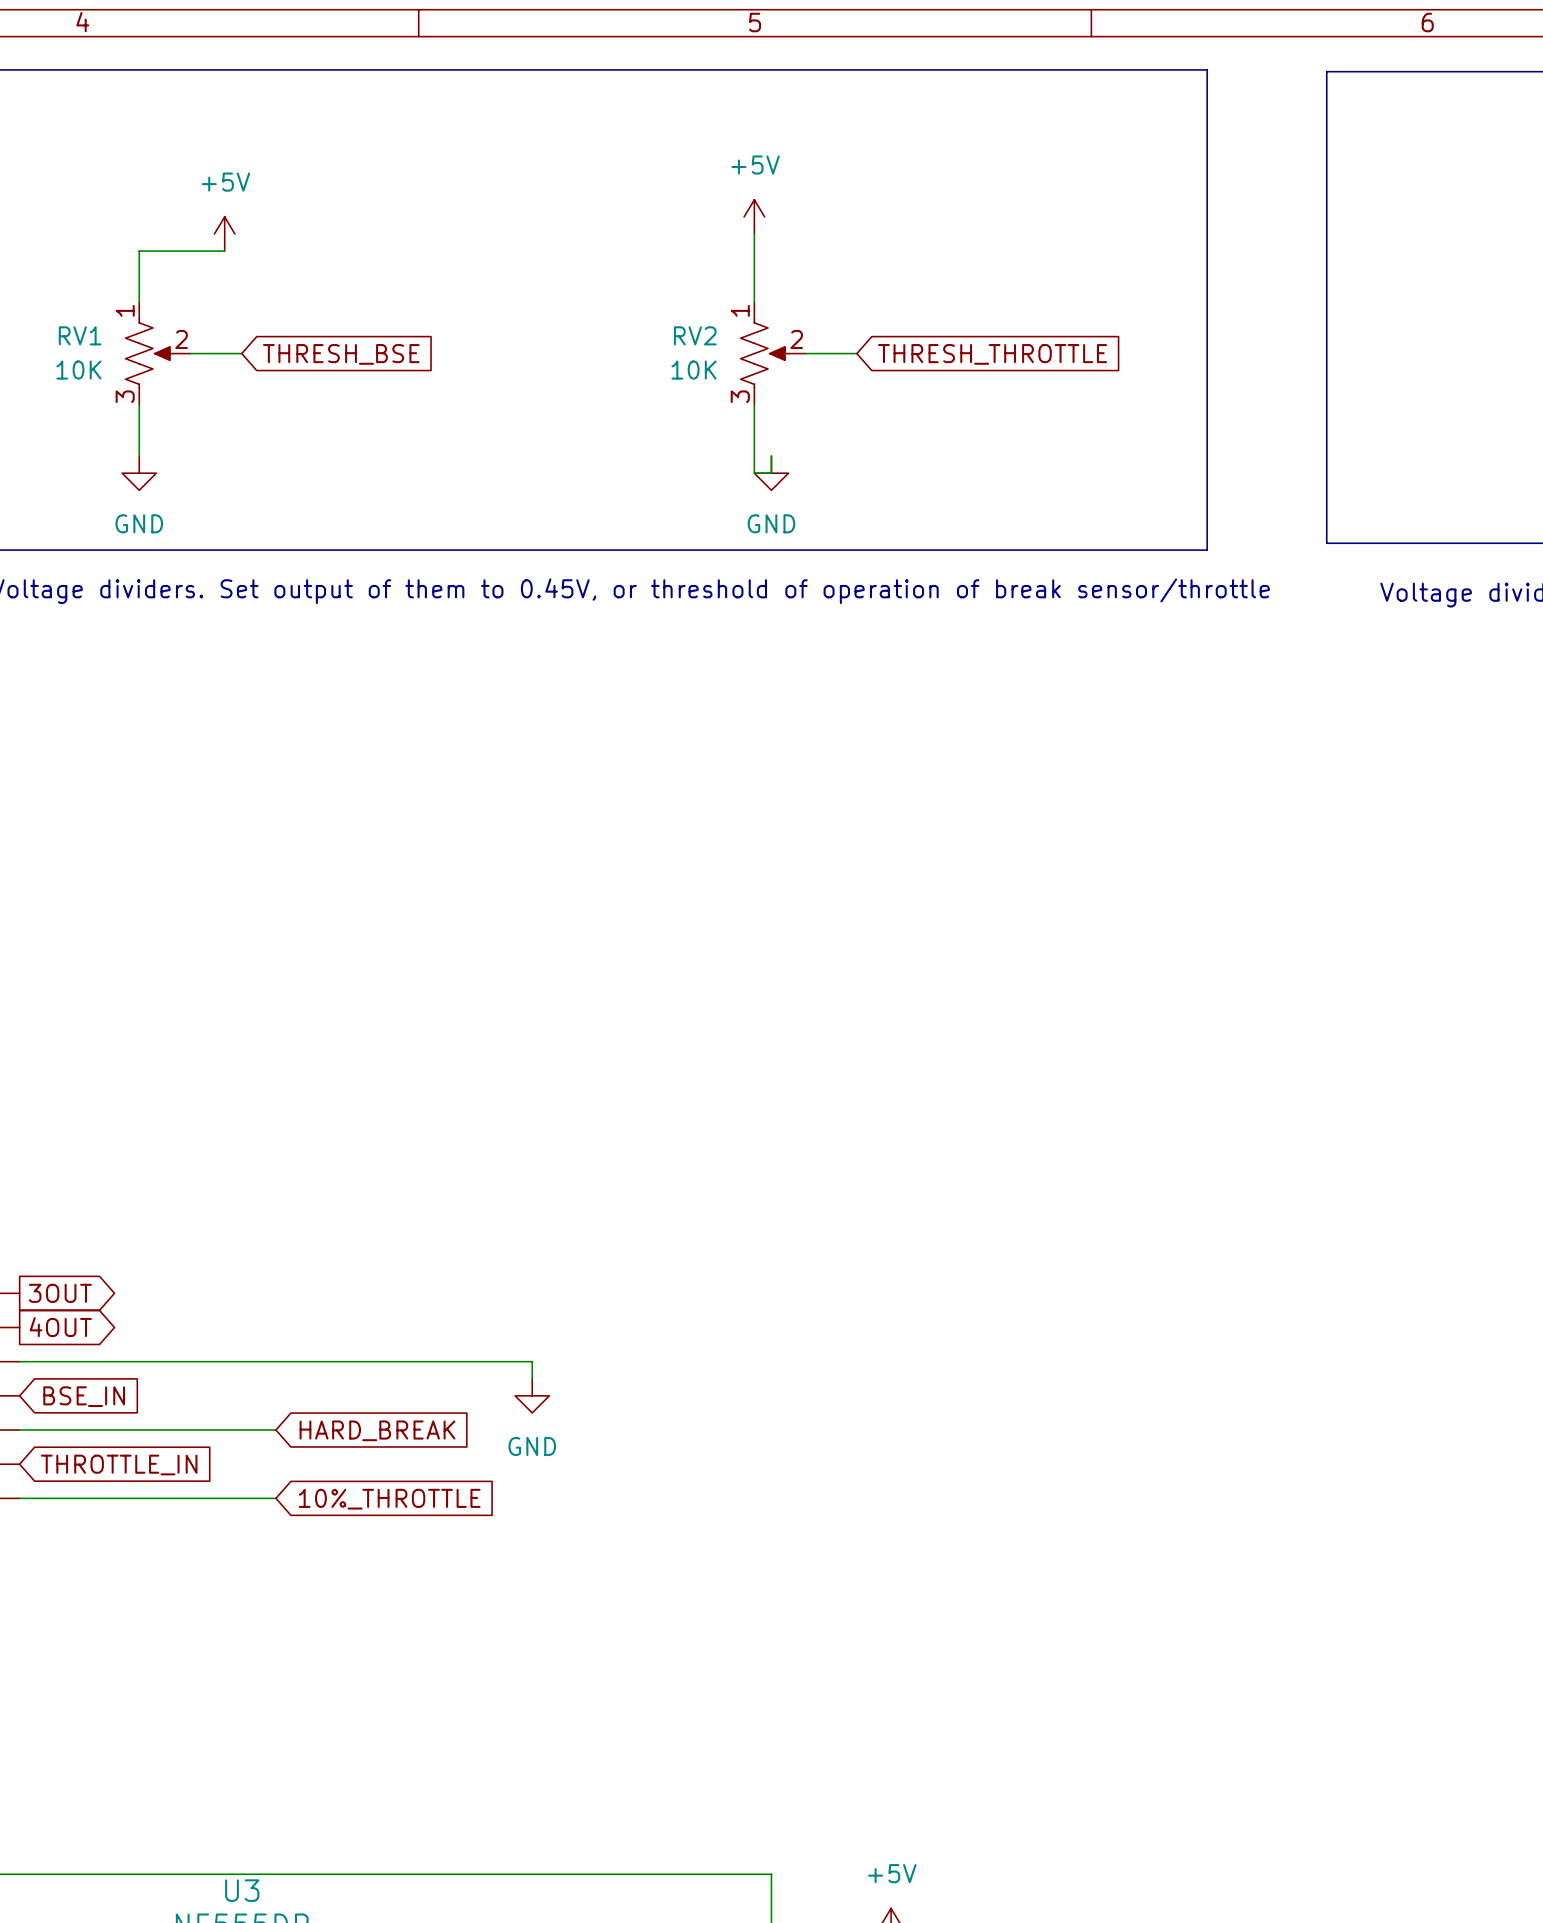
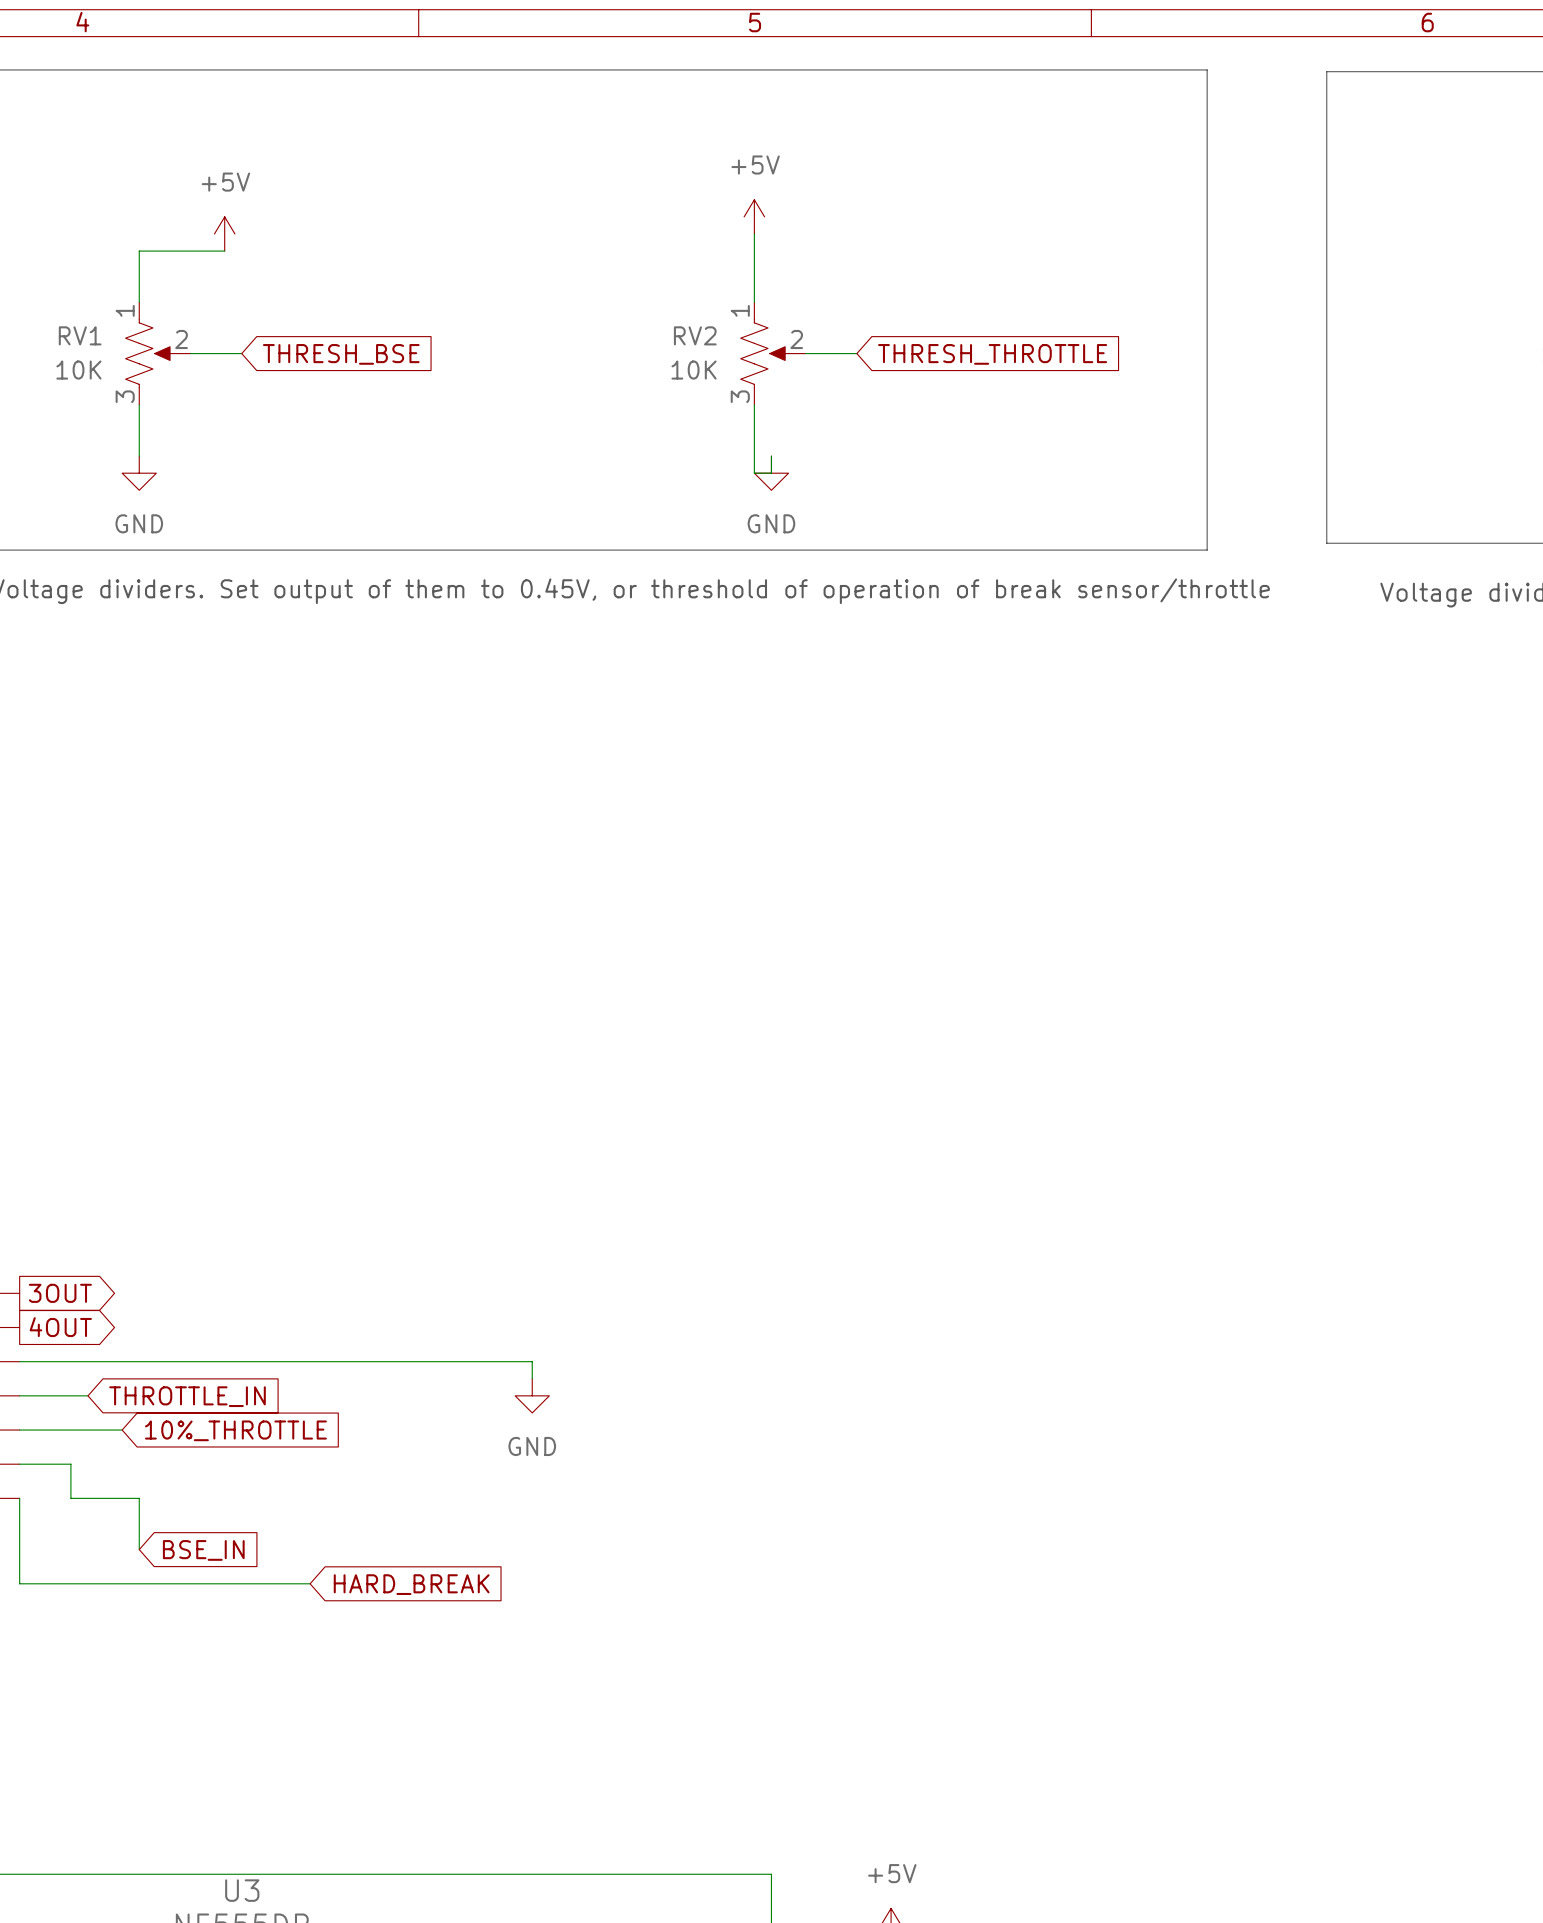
wire: none -> (19, 1395) (88, 1395)
global label position: BSE_IN (84, 1396) -> BSE_IN (203, 1550)
wire: (122, 1430) (275, 1430) -> none
global label position: HARD_BREAK (377, 1430) -> HARD_BREAK (411, 1584)
global label position: THROTTLE_IN (119, 1465) -> THROTTLE_IN (187, 1396)
wire: (19, 1498) (70, 1498) -> (19, 1464) (70, 1464) (70, 1498)
wire: none -> (19, 1498) (19, 1583) (310, 1583)
wire: (139, 1498) (275, 1498) -> (139, 1498) (139, 1549)
global label position: 10%_THROTTLE (389, 1499) -> 10%_THROTTLE (235, 1430)

